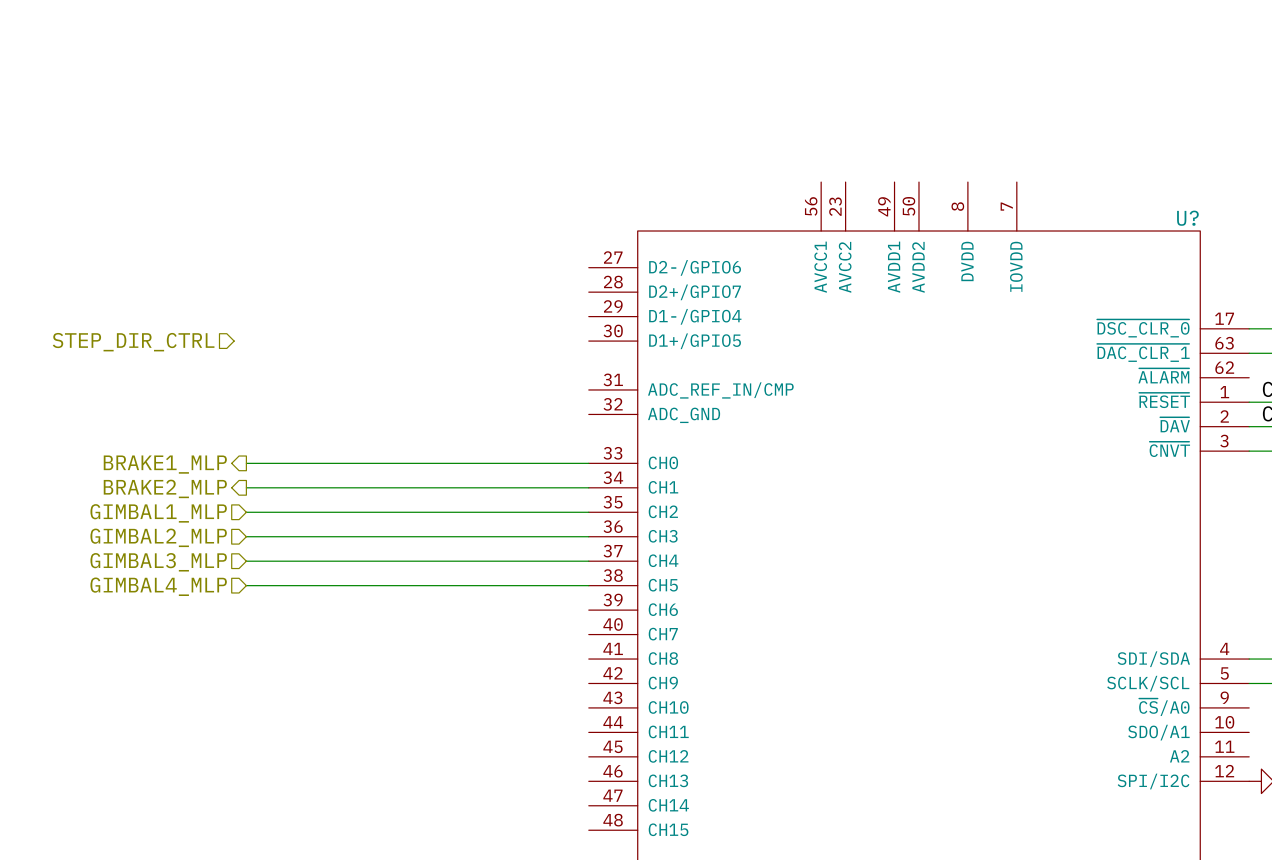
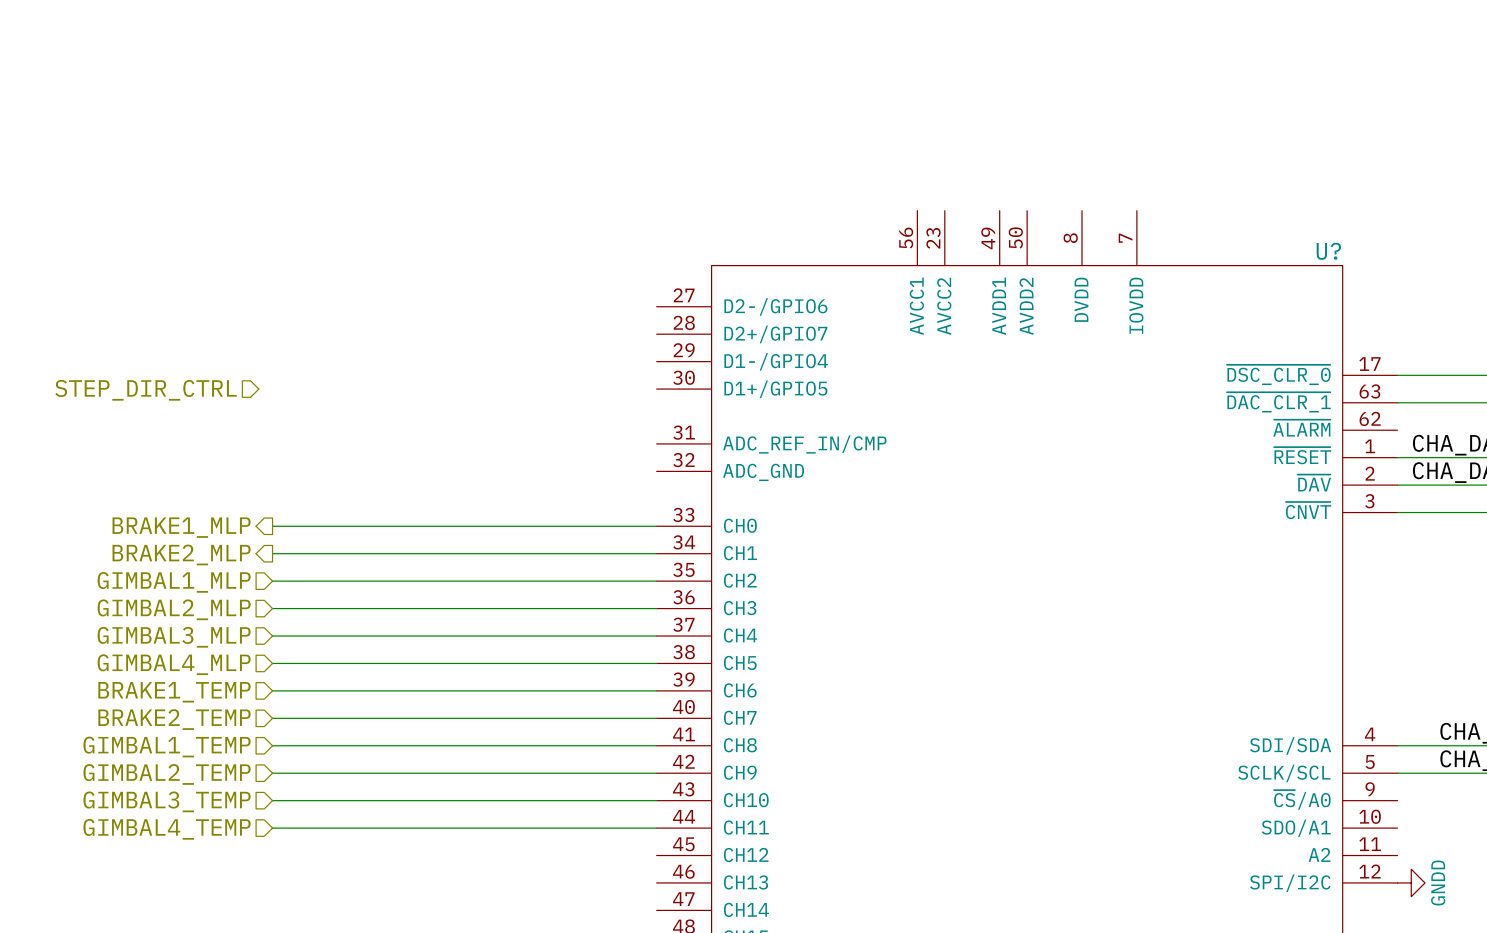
wire: none -> (272, 690) (656, 690)
hierarchical label: none -> BRAKE1_TEMP (174, 692)
wire: none -> (272, 718) (656, 718)
hierarchical label: none -> BRAKE2_TEMP (174, 719)
wire: none -> (272, 745) (656, 745)
hierarchical label: none -> GIMBAL1_TEMP (167, 747)
wire: none -> (272, 773) (656, 773)
hierarchical label: none -> GIMBAL2_TEMP (167, 774)
wire: none -> (272, 800) (656, 800)
hierarchical label: none -> GIMBAL3_TEMP (167, 801)
wire: none -> (272, 828) (656, 828)
hierarchical label: none -> GIMBAL4_TEMP (167, 829)

